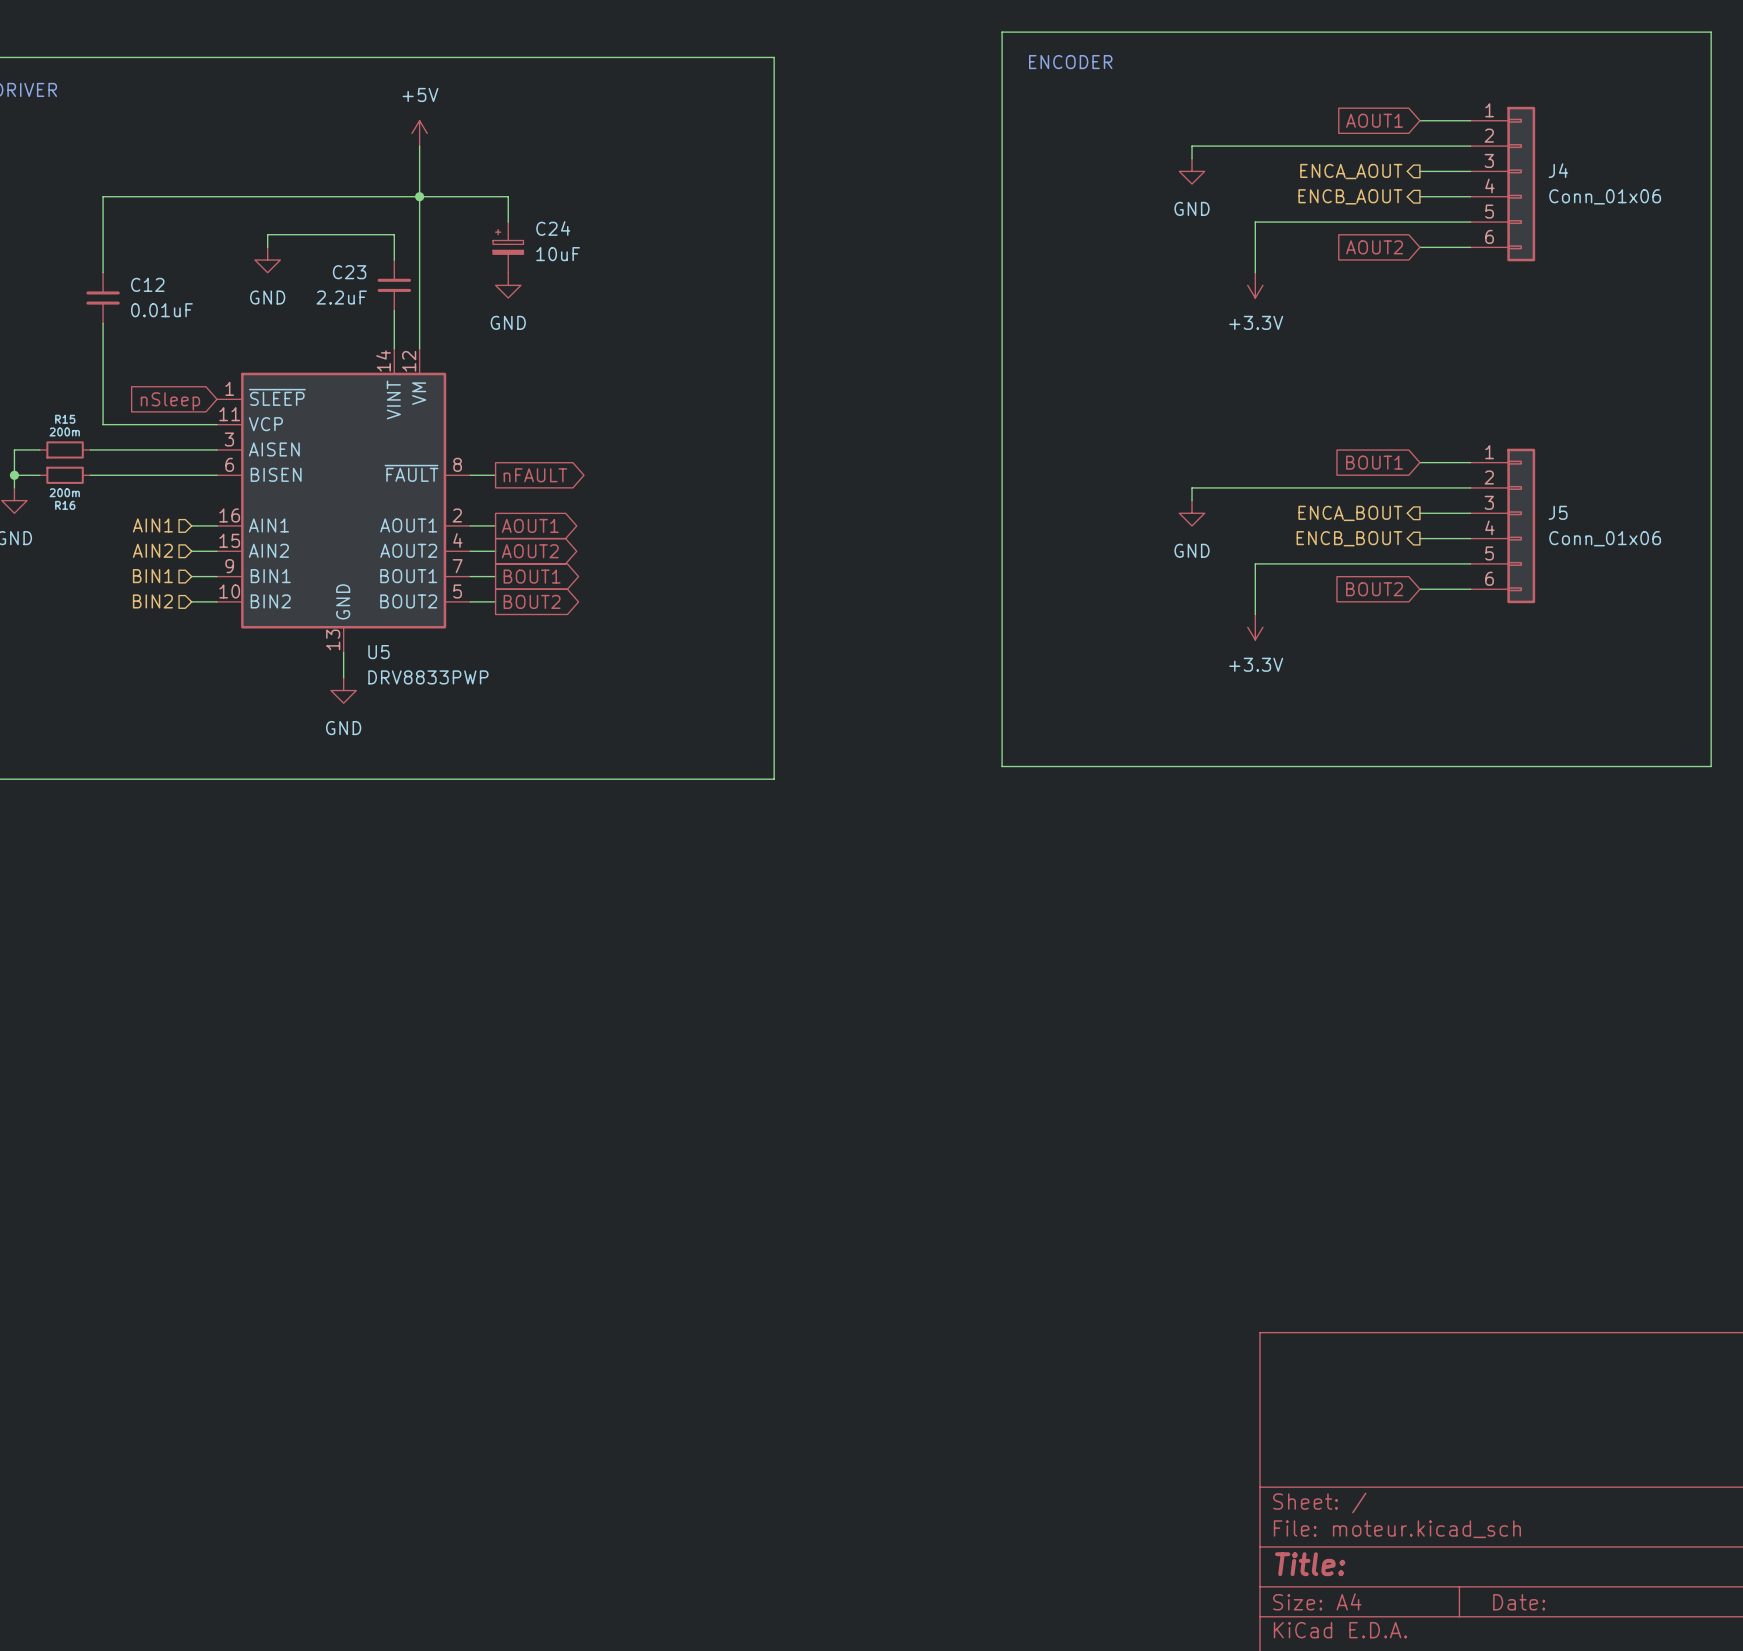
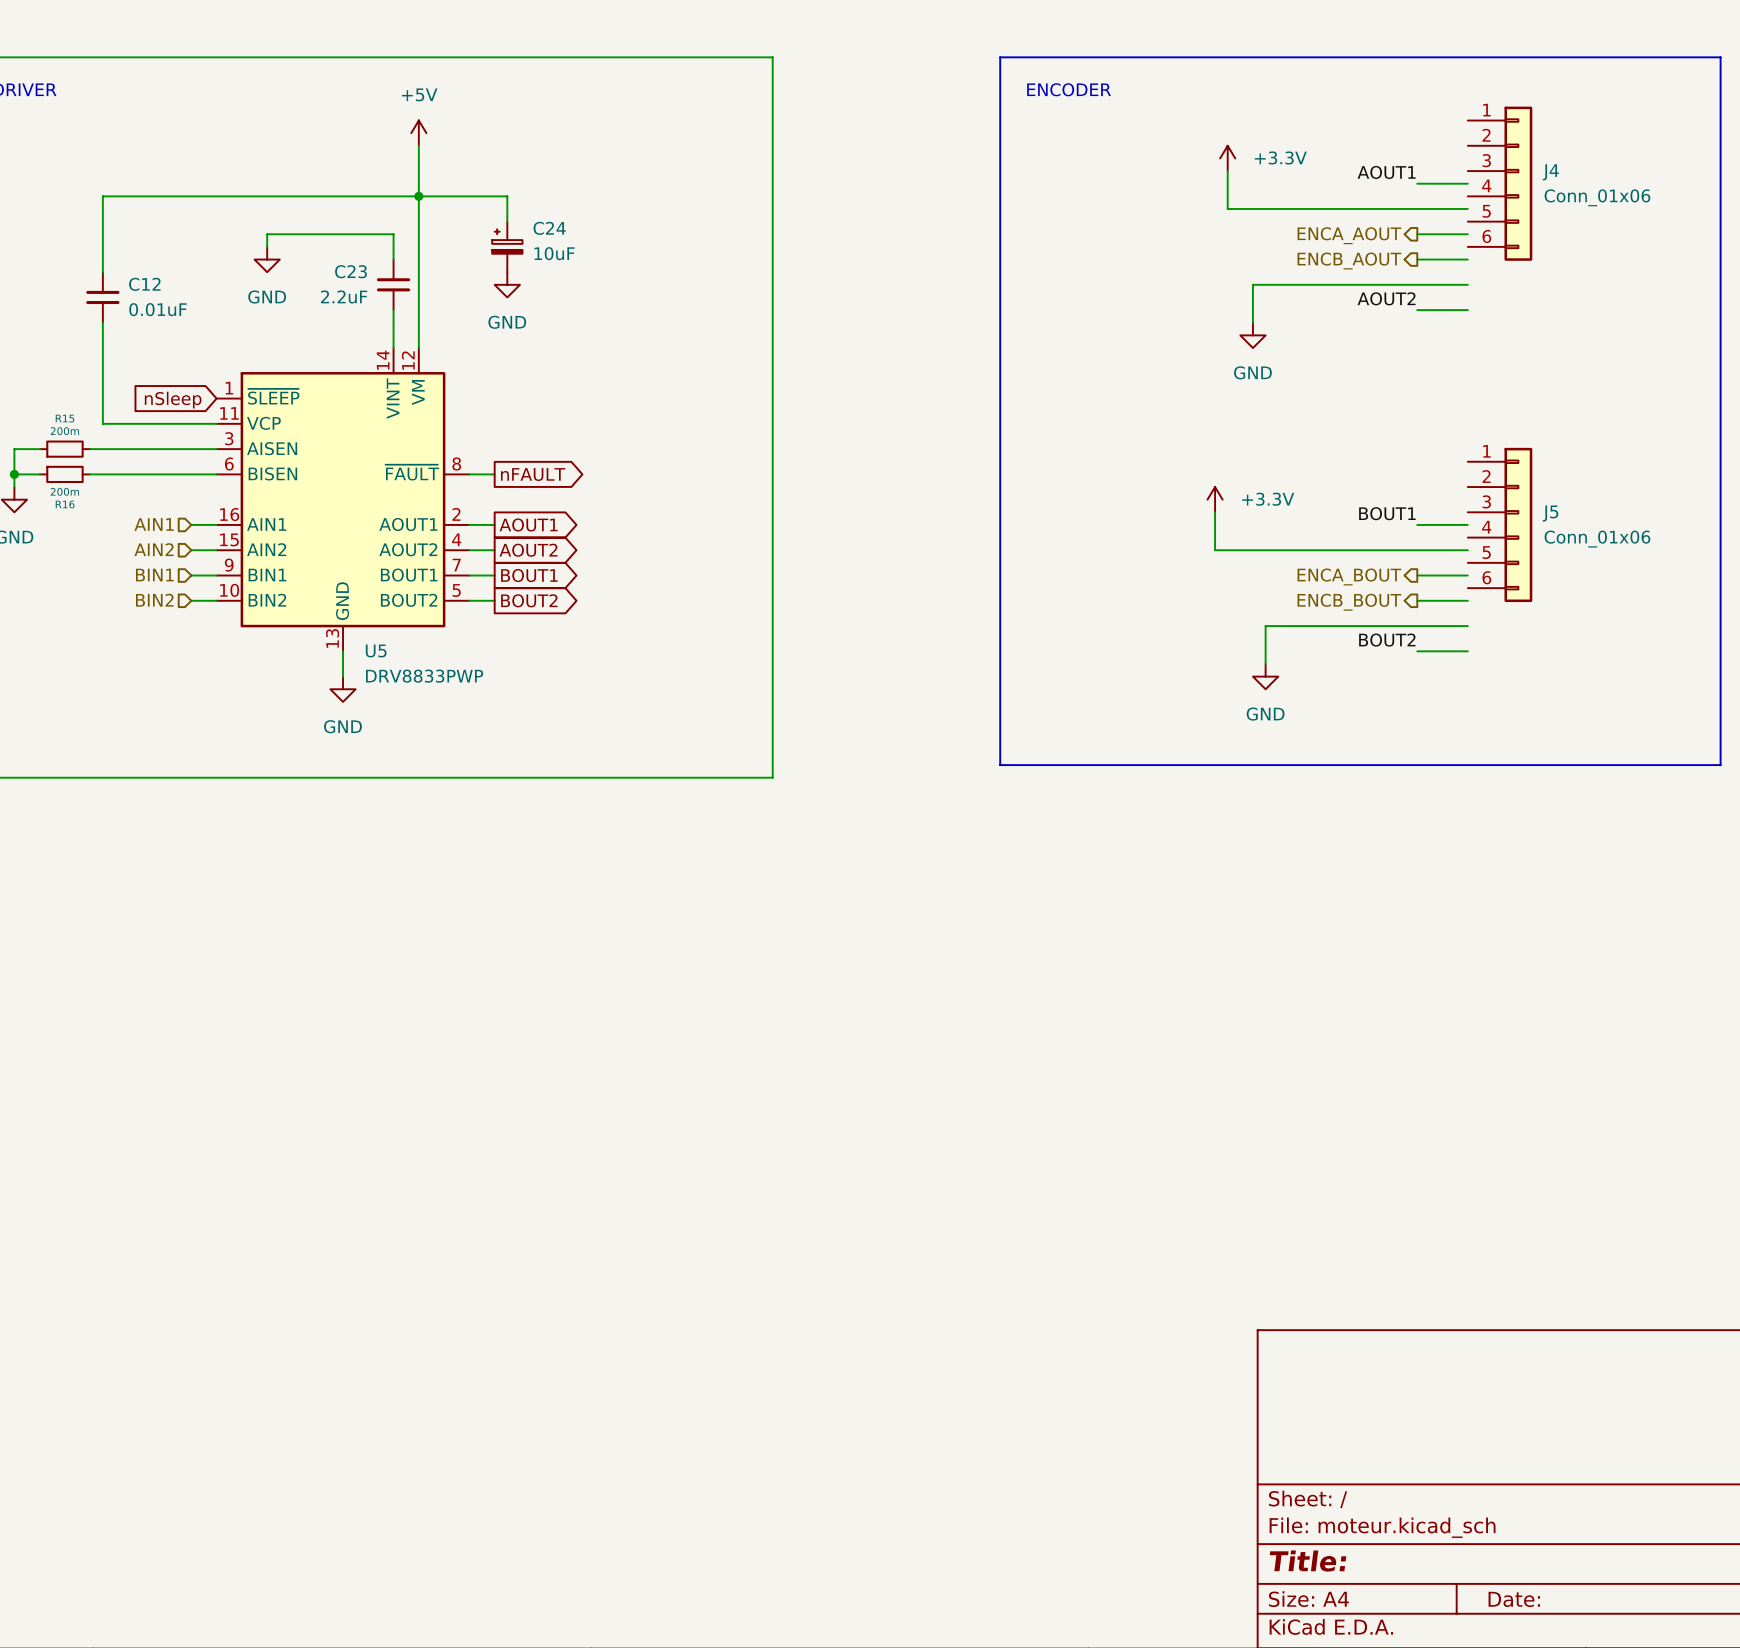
wire: (1002, 32) (1002, 766) (1711, 766) (1711, 32) (1002, 32) -> none
line: none -> (1000, 57) (1720, 57) (1720, 765) (1000, 765) (1000, 57)
text position: ENCODER (1070, 62) -> ENCODER (1069, 89)
global label: AOUT1 (1374, 120) -> none
wire: (1419, 120) (1470, 120) -> (1417, 183) (1467, 183)
wire: (1470, 146) (1192, 146) (1192, 158) -> none
power symbol: none -> +3.3V (1227, 158)
power symbol: GND (1192, 171) -> none
wire: none -> (1227, 171) (1227, 208) (1467, 208)
hierarchical label position: ENCA_AOUT (1351, 171) -> ENCA_AOUT (1349, 235)
wire: (1419, 171) (1470, 171) -> (1417, 234) (1467, 234)
label: none -> AOUT1 (1386, 172)
hierarchical label position: ENCB_AOUT (1350, 196) -> ENCB_AOUT (1349, 261)
wire: (1419, 196) (1470, 196) -> (1417, 259) (1467, 259)
wire: (1470, 222) (1255, 222) (1255, 272) -> none
global label: AOUT2 (1374, 247) -> none
wire: (1419, 247) (1470, 247) -> (1417, 310) (1467, 310)
power symbol: +3.3V (1255, 285) -> none
wire: none -> (1467, 284) (1252, 284) (1252, 322)
label: none -> AOUT2 (1386, 298)
power symbol: none -> GND (1252, 335)
global label: BOUT1 (1374, 462) -> none
wire: (1419, 462) (1470, 462) -> (1417, 524) (1467, 524)
wire: (1470, 487) (1192, 487) (1192, 500) -> none
power symbol: none -> +3.3V (1215, 499)
power symbol: GND (1192, 513) -> none
wire: none -> (1215, 512) (1215, 550) (1467, 550)
hierarchical label position: ENCA_BOUT (1350, 513) -> ENCA_BOUT (1349, 576)
wire: (1419, 513) (1470, 513) -> (1417, 575) (1467, 575)
label: none -> BOUT1 (1387, 513)
hierarchical label position: ENCB_BOUT (1349, 538) -> ENCB_BOUT (1349, 602)
wire: (1419, 538) (1470, 538) -> (1417, 600) (1467, 600)
wire: (1470, 563) (1255, 563) (1255, 614) -> none
global label: BOUT2 (1374, 589) -> none
wire: (1419, 589) (1470, 589) -> (1417, 651) (1467, 651)
power symbol: +3.3V (1255, 627) -> none
wire: none -> (1467, 626) (1265, 626) (1265, 663)
label: none -> BOUT2 (1387, 640)
power symbol: none -> GND (1265, 676)

